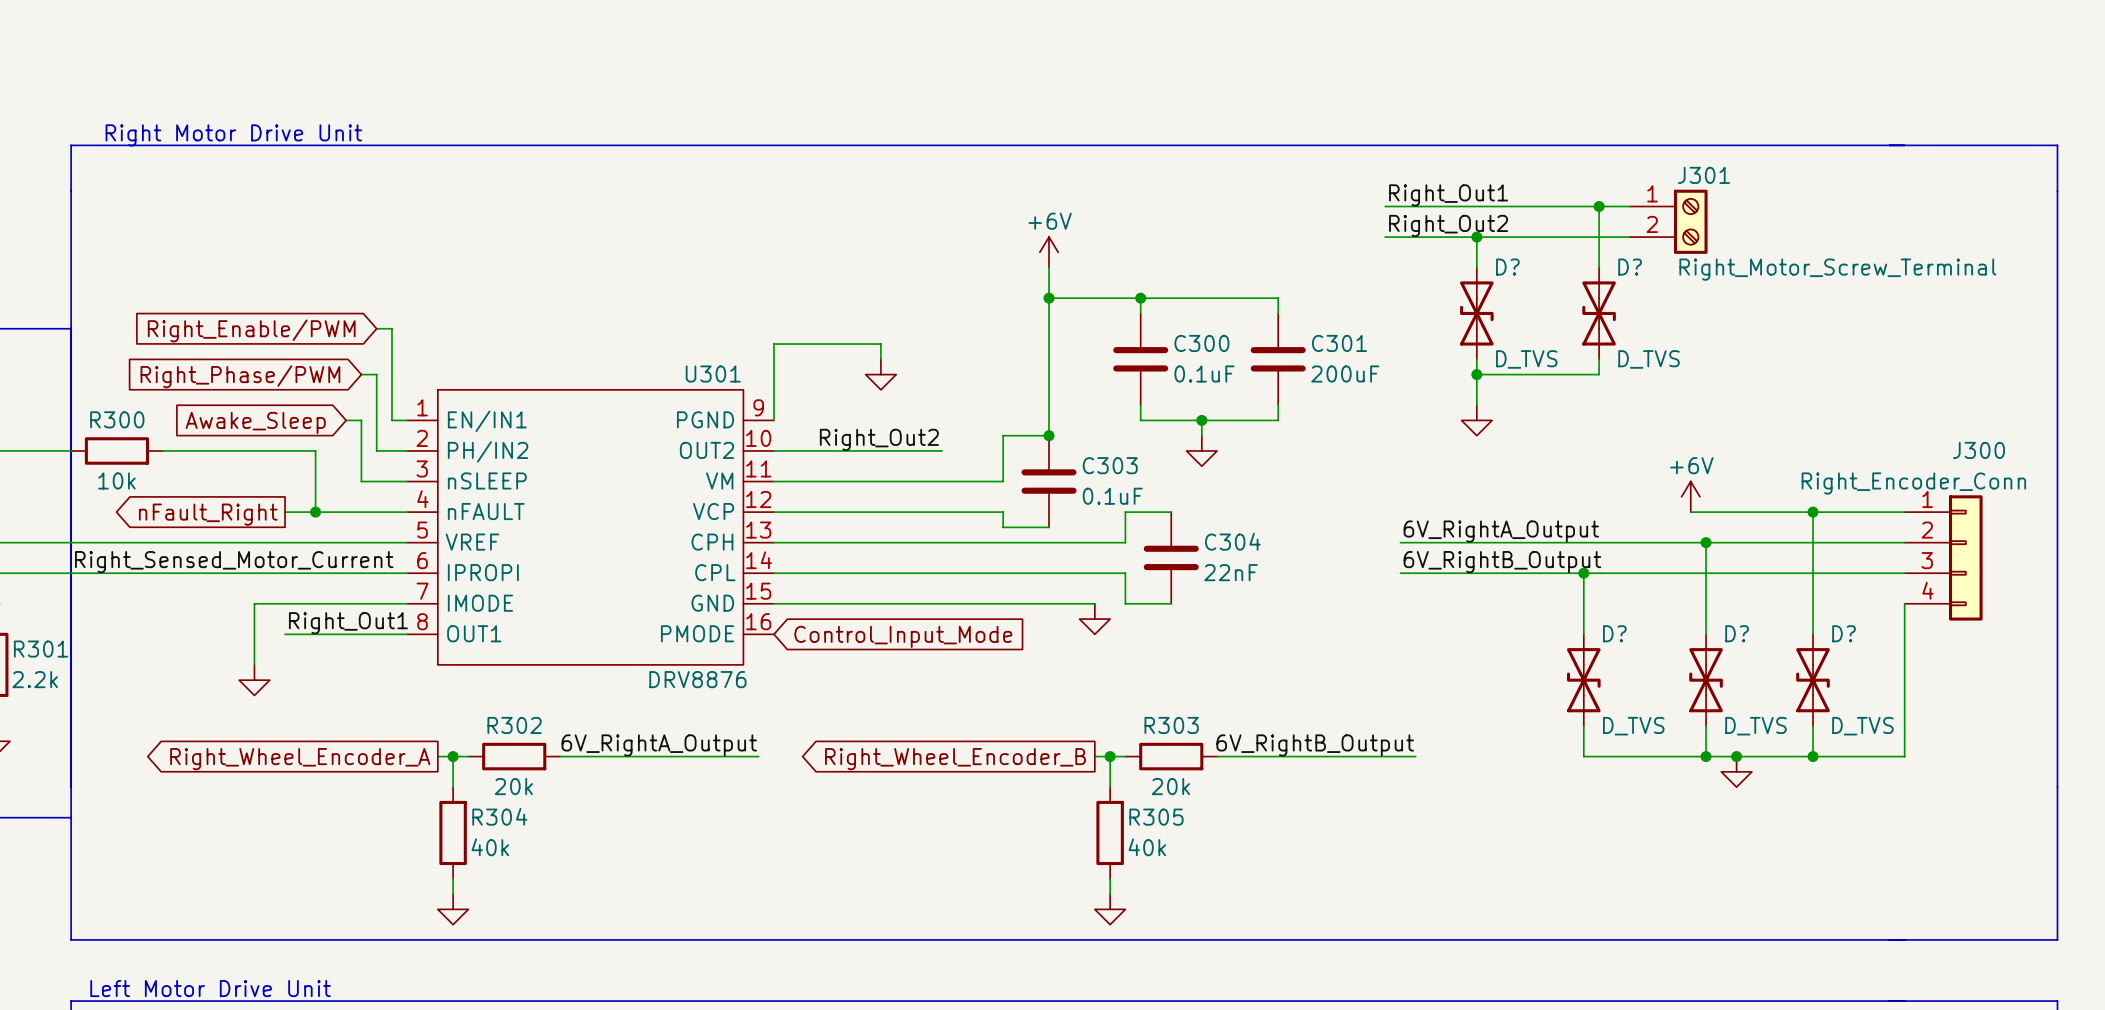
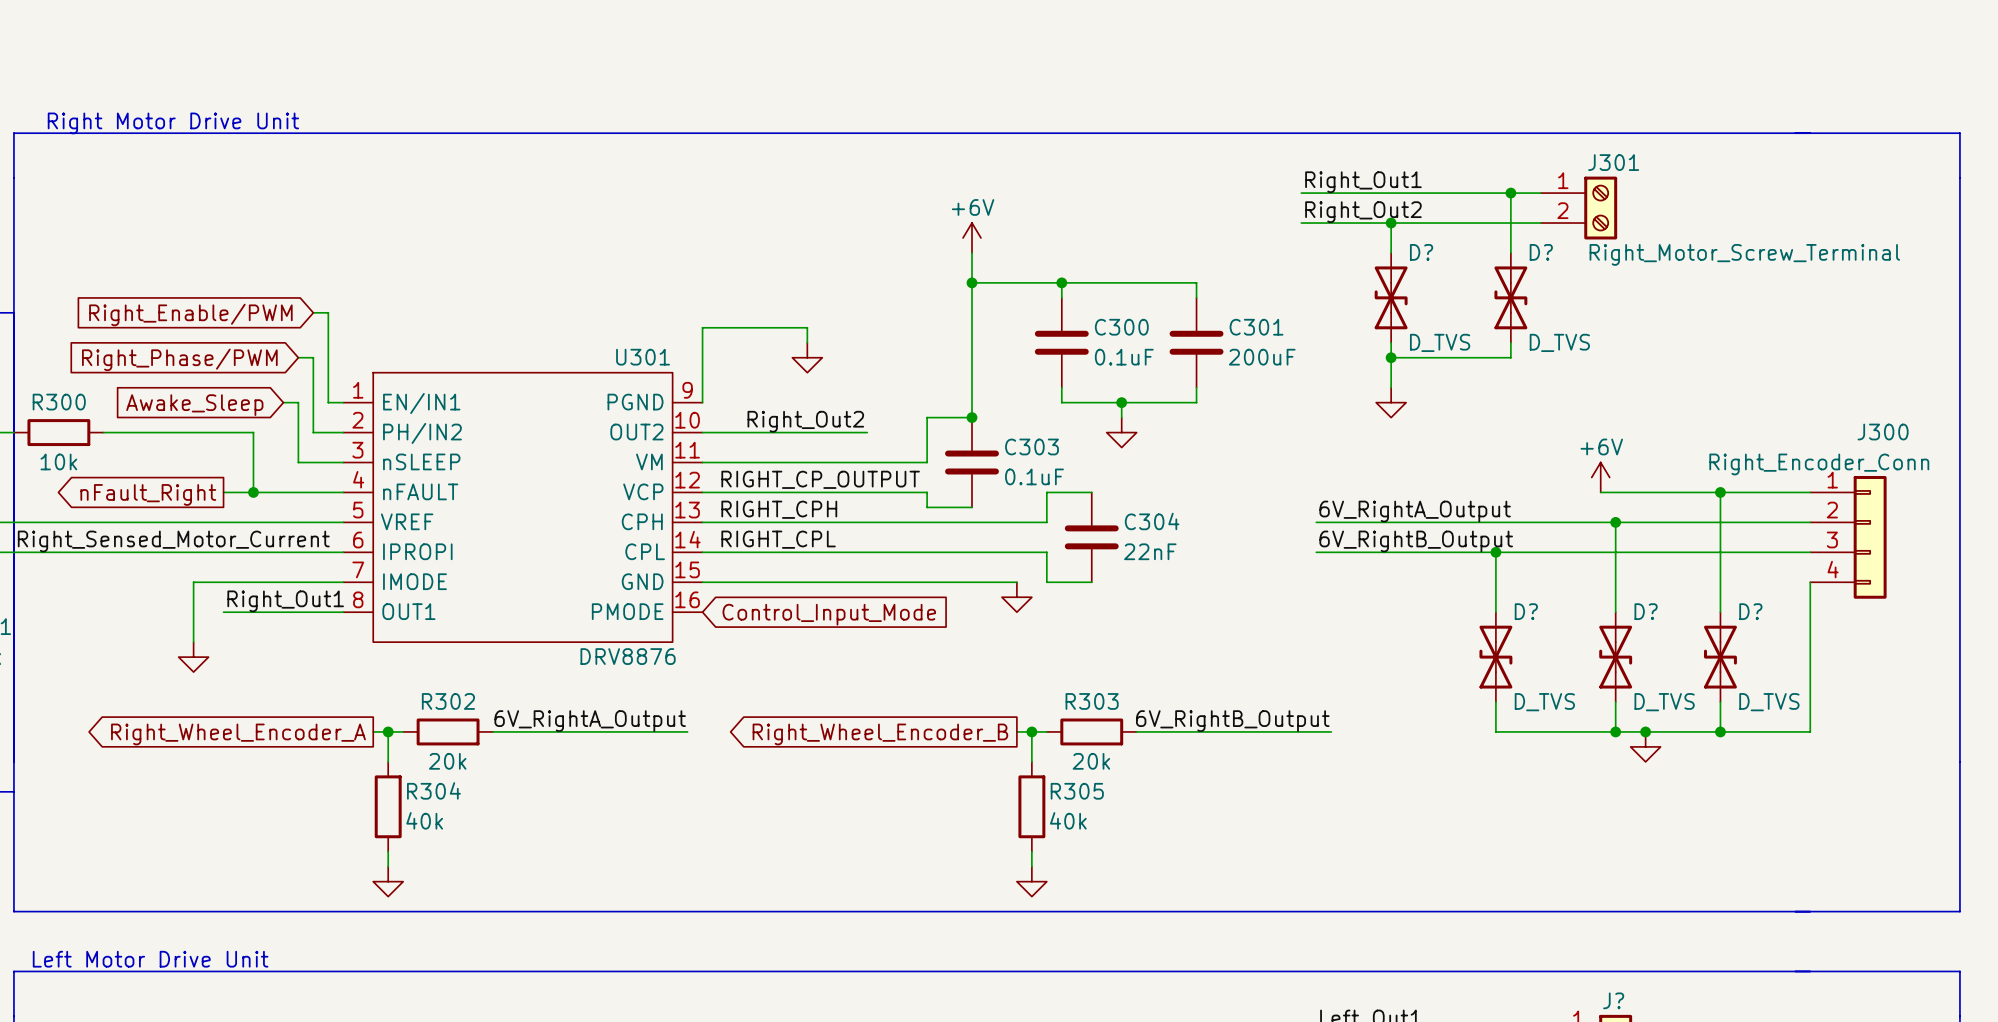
label: none -> RIGHT_CP_OUTPUT (820, 479)
label: none -> RIGHT_CPH (779, 509)
label: none -> RIGHT_CPL (778, 539)

